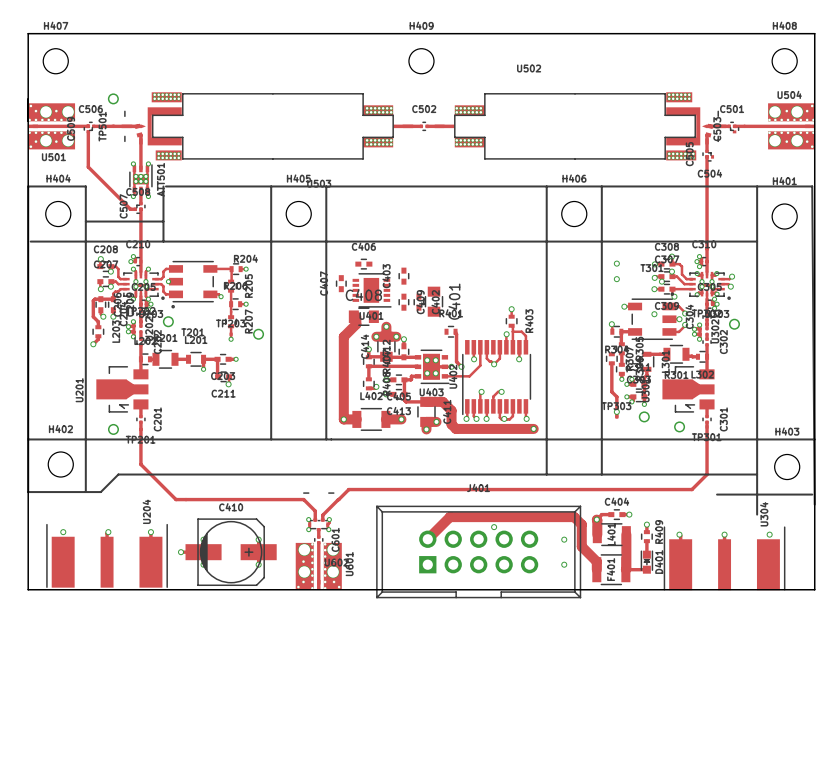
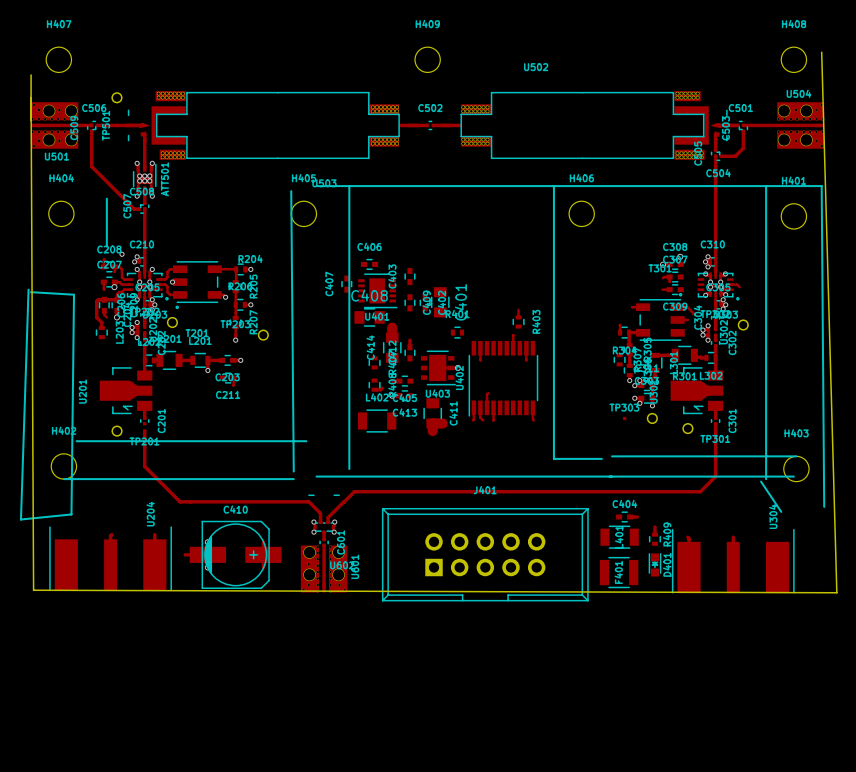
board edge: none -> (821, 52) (836, 592) (33, 590) (31, 97)
board edge: (28, 76) (28, 33) (814, 33) (814, 589) (28, 589) (28, 121) -> none
track: none -> (743, 131) (743, 148) (735, 156) (721, 156)
line: (163, 186) (163, 241) -> none
line: (165, 186) (311, 186) -> none
line: (271, 186) (271, 439) -> none
line: (326, 186) (326, 439) -> none
line: none -> (349, 186) (349, 468)
line: (601, 186) (601, 474) -> none
line: none -> (291, 191) (293, 471)
line: none -> (106, 198) (106, 246)
line: (85, 221) (163, 221) -> none
line: (30, 241) (757, 241) -> none
via: none -> (122, 254)
track: (671, 256) (672, 264) (679, 264) (681, 266) (681, 274) (686, 279) (692, 279) -> none
via: (100, 259) -> none
via: (616, 263) -> none
via: (110, 271) -> none
track: (671, 271) (672, 276) (676, 276) (684, 284) (692, 284) -> none
via: (671, 271) -> none
track: (732, 276) (729, 279) (721, 279) -> none
via: (732, 276) -> none
via: (654, 277) -> none
via: (616, 279) -> none
via: (661, 281) -> none
via: (730, 286) -> none
line: none -> (28, 289) (20, 519) (71, 514) (74, 294) (31, 292)
via: (100, 289) -> none
via: (654, 289) -> none
track: (692, 289) (672, 289) (674, 296) -> none
via: (674, 296) -> none
via: (624, 306) -> none
via: (511, 309) -> none
via: (685, 313) -> none
via: (654, 314) -> none
via: (103, 316) -> none
track: (356, 316) (356, 324) (343, 336) (343, 419) (356, 419) -> none
via: (679, 319) -> none
via: (611, 324) -> none
track: (685, 324) (678, 331) (669, 331) -> none
via: (685, 324) -> none
track: (511, 325) (512, 347) -> none
via: (386, 326) -> none
track: (455, 331) (456, 361) (461, 366) -> none
track: (512, 331) (521, 331) (525, 336) (525, 347) -> none
via: (506, 334) -> none
track: (98, 336) (98, 339) (93, 344) -> none
track: (376, 336) (396, 336) -> none
via: (376, 336) -> none
via: (396, 336) -> none
via: (403, 339) -> none
via: (93, 344) -> none
track: (480, 347) (480, 365) (469, 376) (444, 376) -> none
track: (486, 347) (486, 358) (494, 364) (499, 358) (499, 347) -> none
track: (368, 349) (368, 357) (418, 357) -> none
via: (368, 349) -> none
track: (217, 359) (218, 376) -> none
via: (474, 359) -> none
via: (519, 359) -> none
via: (427, 360) -> none
via: (435, 360) -> none
track: (611, 363) (611, 391) (616, 396) (616, 416) -> none
via: (494, 364) -> none
track: (418, 366) (368, 366) (368, 379) -> none
via: (461, 366) -> none
via: (427, 373) -> none
via: (435, 373) -> none
track: (418, 376) (411, 376) (410, 379) (404, 379) (404, 400) (406, 401) (442, 401) (451, 410) (451, 424) (456, 428) (533, 428) -> none
via: (386, 379) -> none
via: (228, 384) -> none
via: (376, 386) -> none
via: (481, 391) -> none
track: (501, 391) (498, 391) (493, 396) (493, 406) -> none
via: (501, 391) -> none
track: (499, 406) (499, 417) (501, 419) (509, 419) (512, 416) (512, 406) -> none
via: (616, 411) -> none
via: (466, 418) -> none
via: (476, 418) -> none
via: (486, 418) -> none
via: (504, 418) -> none
via: (526, 418) -> none
via: (343, 419) -> none
track: (385, 419) (401, 419) -> none
via: (401, 419) -> none
via: (436, 421) -> none
track: (140, 422) (140, 429) -> none
via: (533, 428) -> none
via: (426, 429) -> none
line: (28, 439) (73, 439) -> none
line: (301, 439) (814, 439) -> none
line: none -> (612, 456) (796, 456)
line: (546, 456) (546, 474) -> (553, 458) (601, 458)
line: (311, 474) (118, 474) (100, 492) (28, 492) (28, 186) (85, 186) (85, 492) -> none
line: none -> (766, 476) (793, 476)
line: none -> (63, 479) (293, 479)
line: (757, 477) (757, 514) -> none
line: none -> (761, 481) (781, 511)
line: (717, 494) (812, 494) -> none
track: (611, 514) (601, 514) (596, 519) (597, 534) -> none
via: (629, 514) -> none
via: (596, 519) -> none
via: (646, 524) -> none
via: (494, 527) -> none
via: (63, 532) -> none
via: (108, 532) -> none
via: (150, 532) -> none
track: (626, 534) (625, 569) (646, 569) -> none
via: (679, 534) -> none
via: (724, 534) -> none
via: (769, 534) -> none
via: (258, 539) -> none
track: (427, 539) (449, 517) (574, 517) (581, 524) (581, 546) (596, 561) (596, 569) -> none
via: (564, 539) -> none
track: (646, 541) (646, 554) -> none
via: (181, 552) -> none
via: (258, 564) -> none
via: (564, 564) -> none

